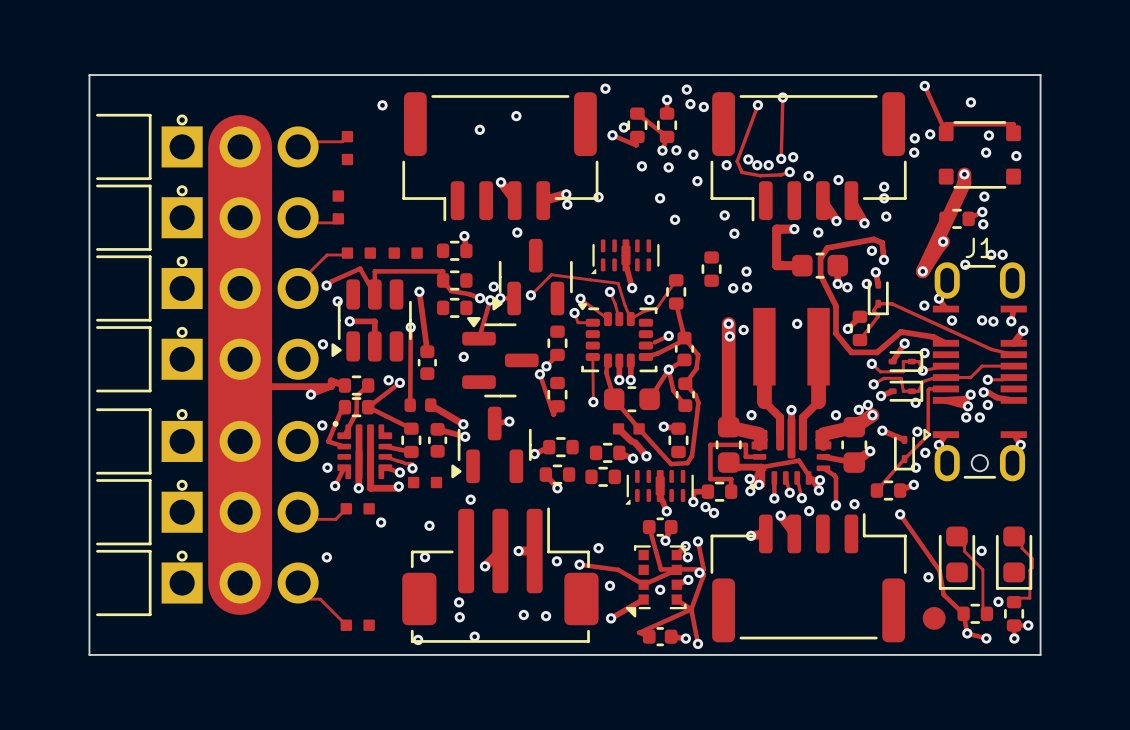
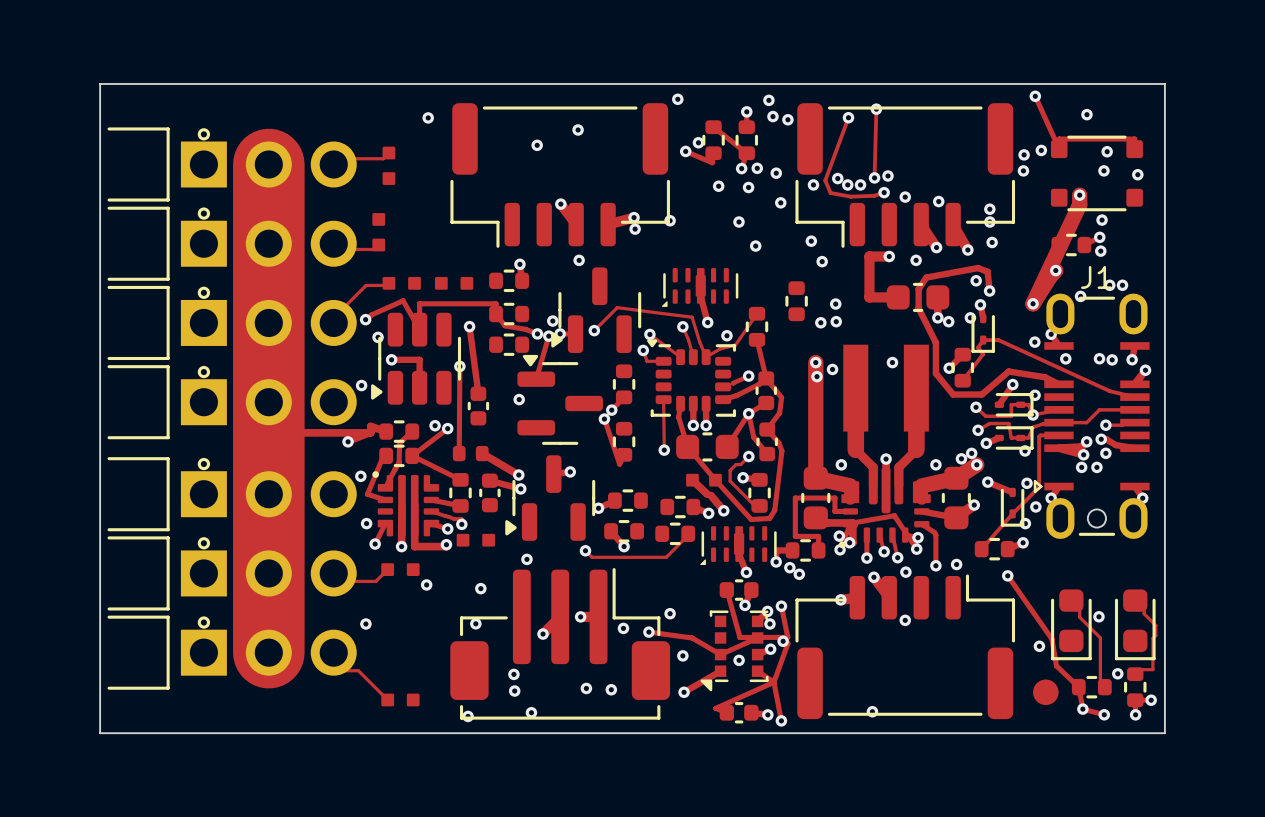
track: none -> (748, 456) (740, 464) (736, 464) (730, 470) (730, 481) (754, 505) (759, 505)
via: none -> (748, 456)
track: none -> (683, 539) (666, 557) (592, 557) (585, 550)
via: none -> (585, 550)
via: none -> (905, 620)
via: none -> (872, 711)

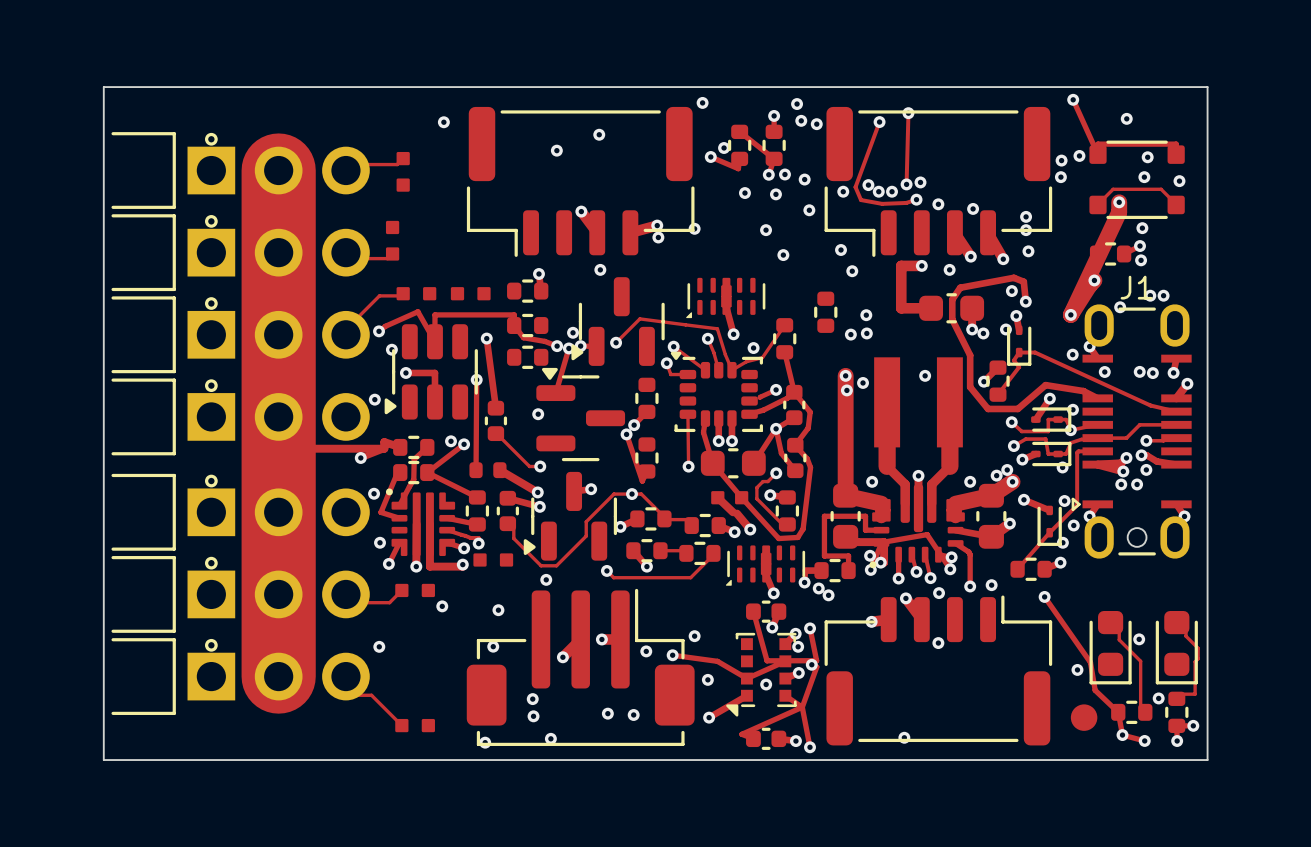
track: none -> (1104, 198) (1113, 189) (1161, 189) (1172, 200)
track: none -> (501, 438) (529, 466) (540, 466)
via: none -> (540, 466)
via: none -> (632, 494)
track: none -> (659, 512) (641, 494) (613, 494) (586, 521) (586, 536) (556, 565) (541, 565) (513, 538) (513, 528)
track: none -> (669, 519) (687, 519)
track: none -> (660, 550) (683, 550) (686, 553)

